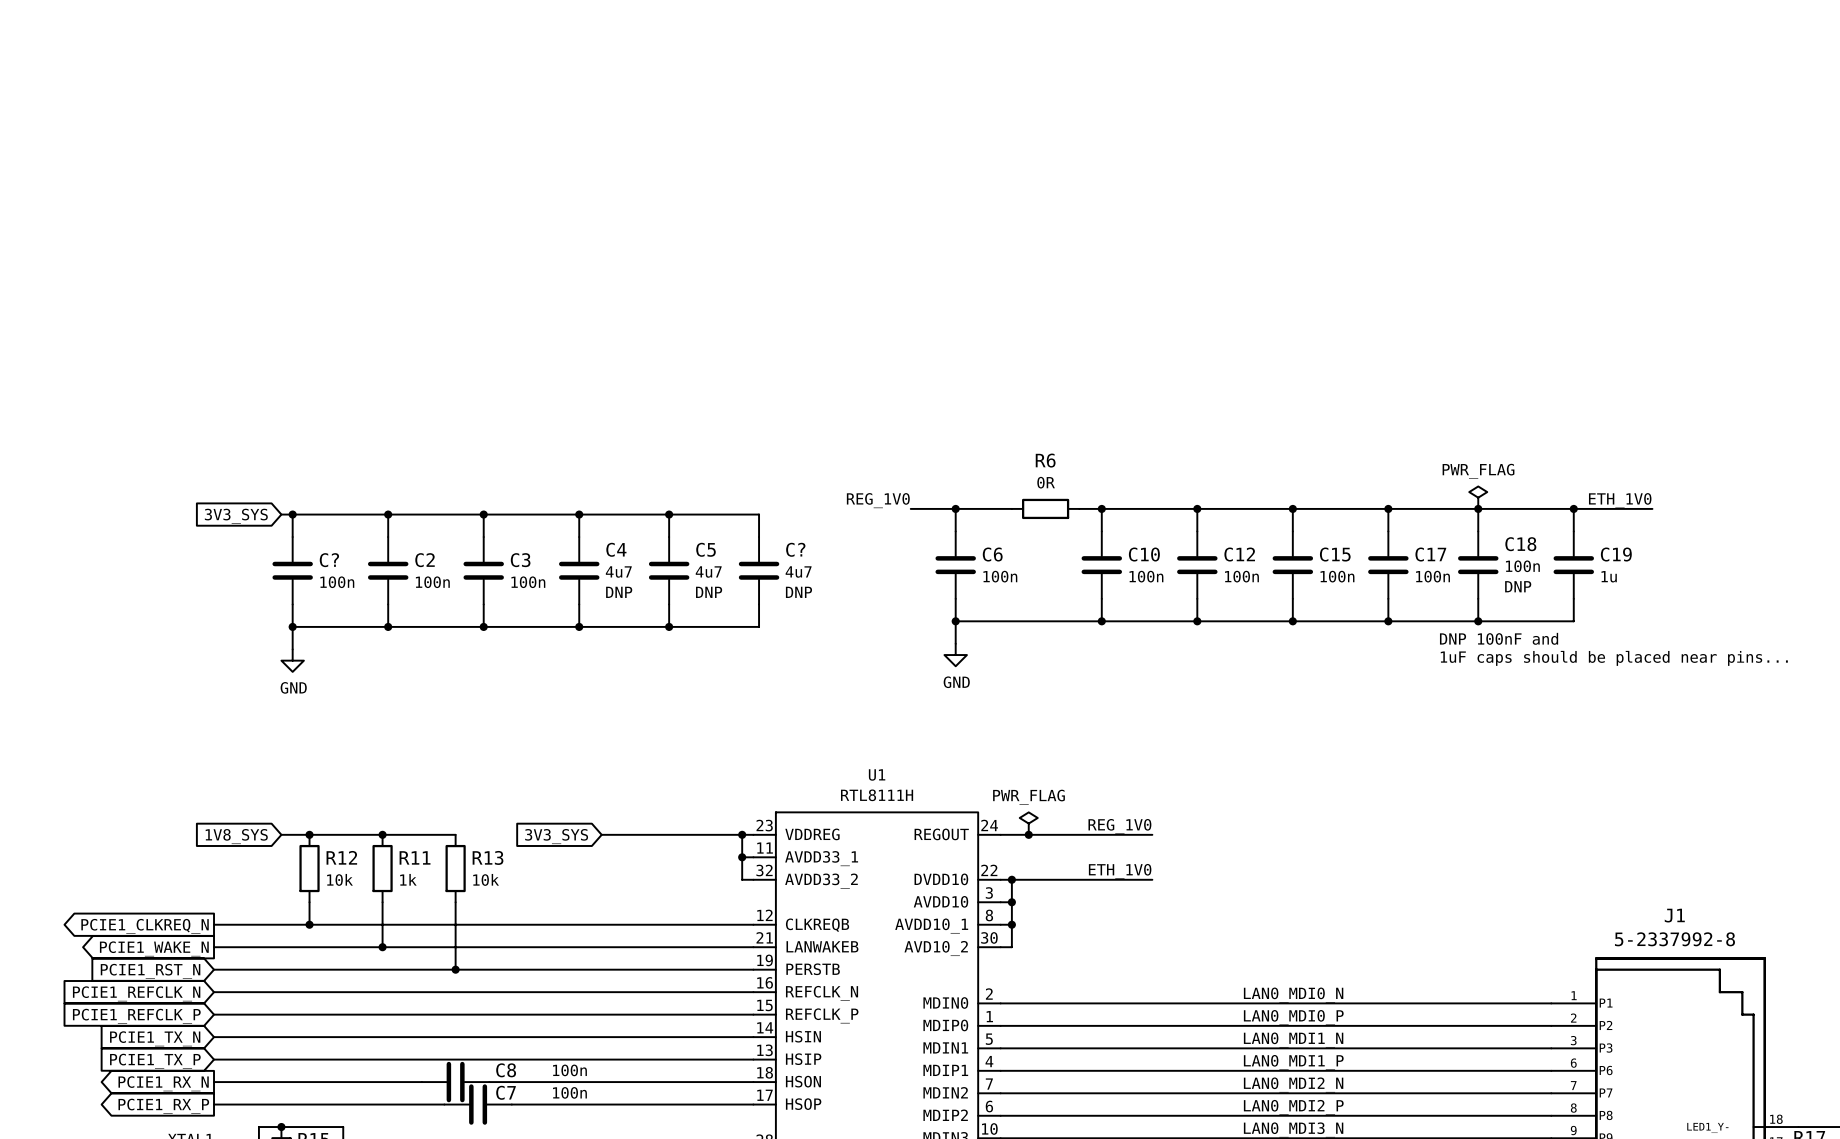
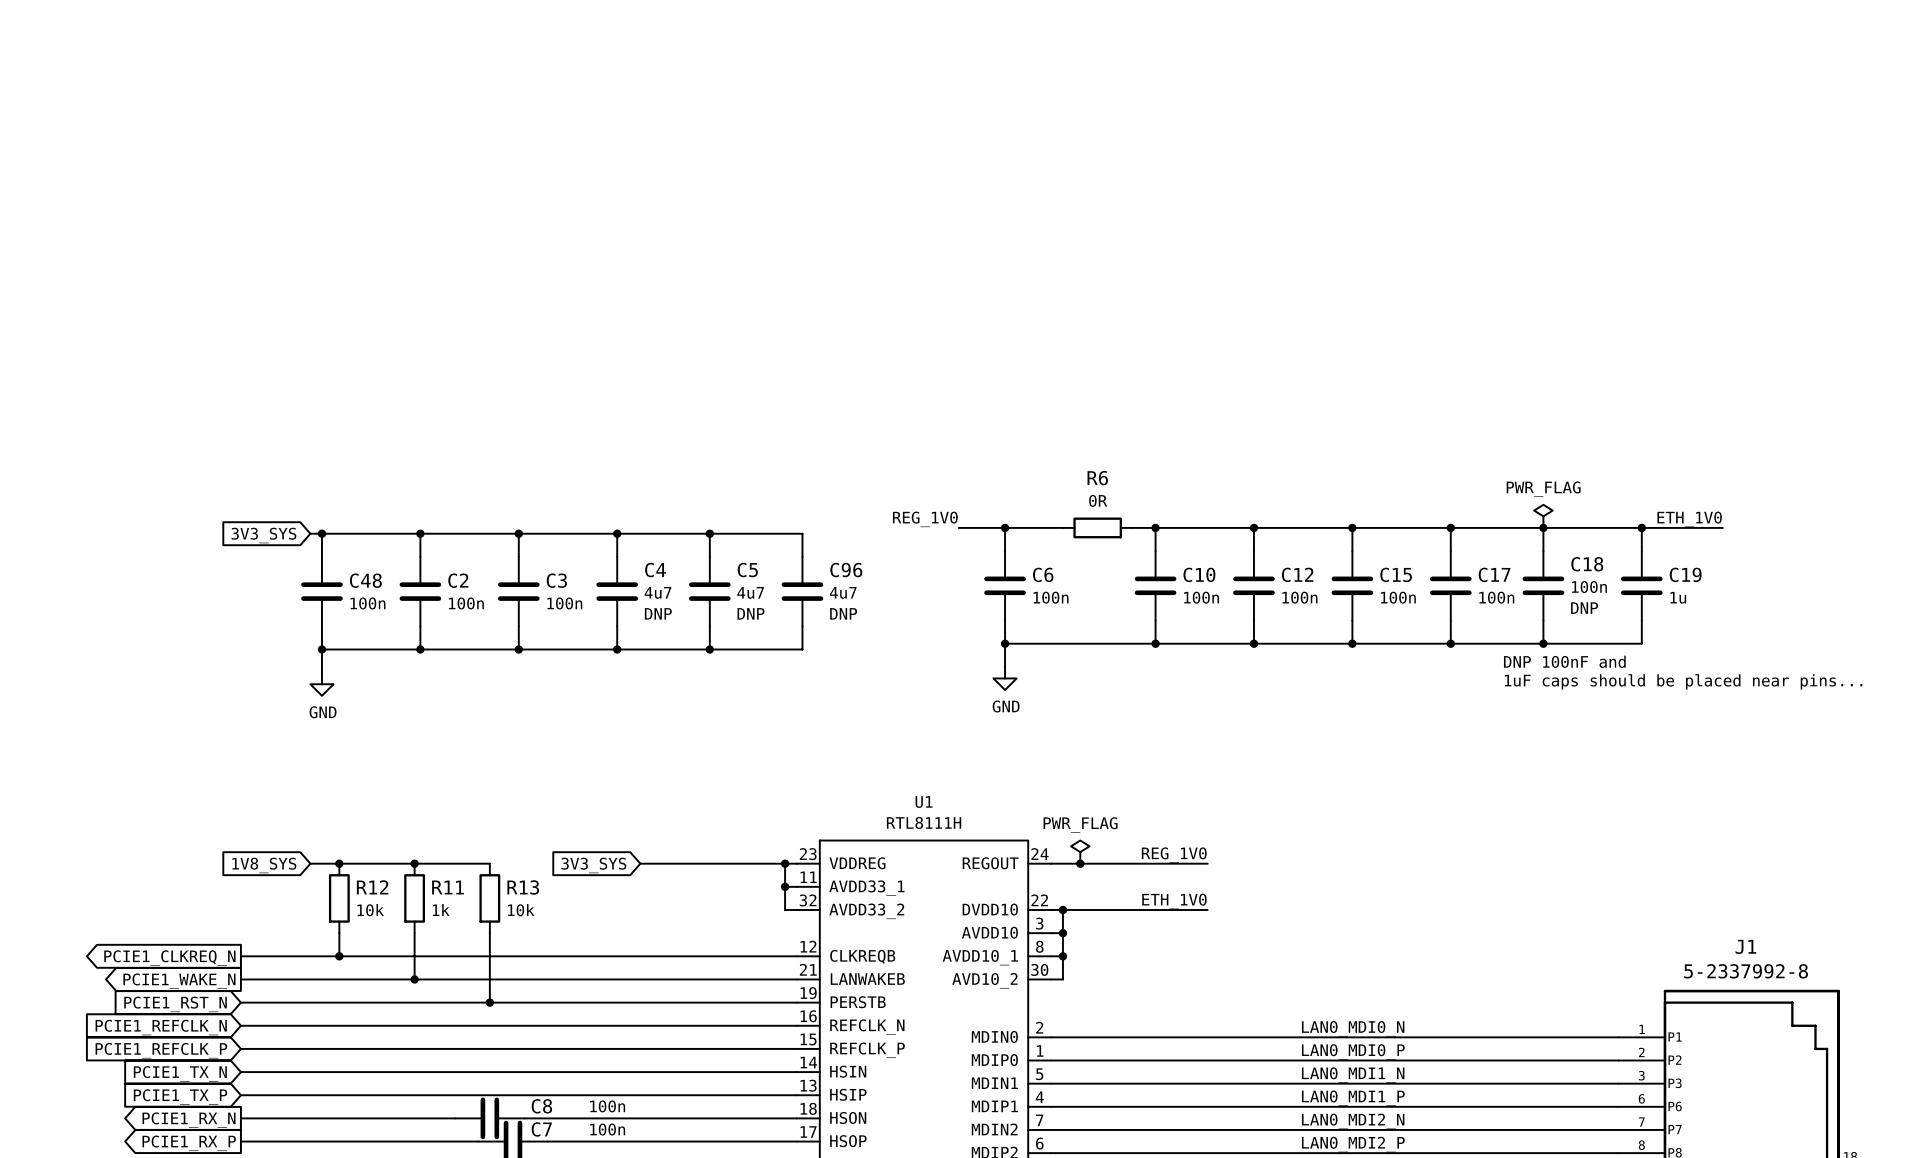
C? name: C? (795, 549) -> C96 (846, 570)
C? name: C? (329, 560) -> C48 (365, 580)

